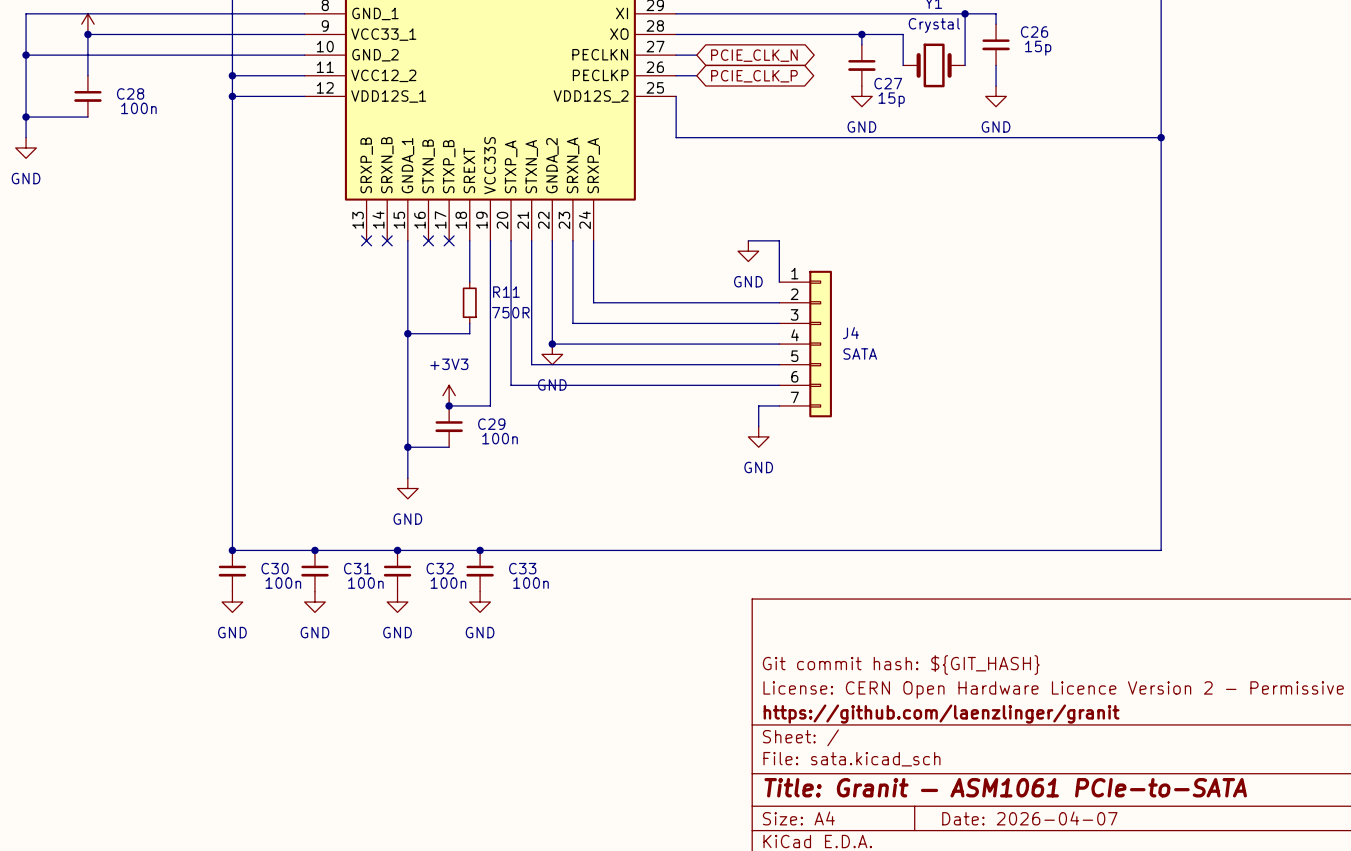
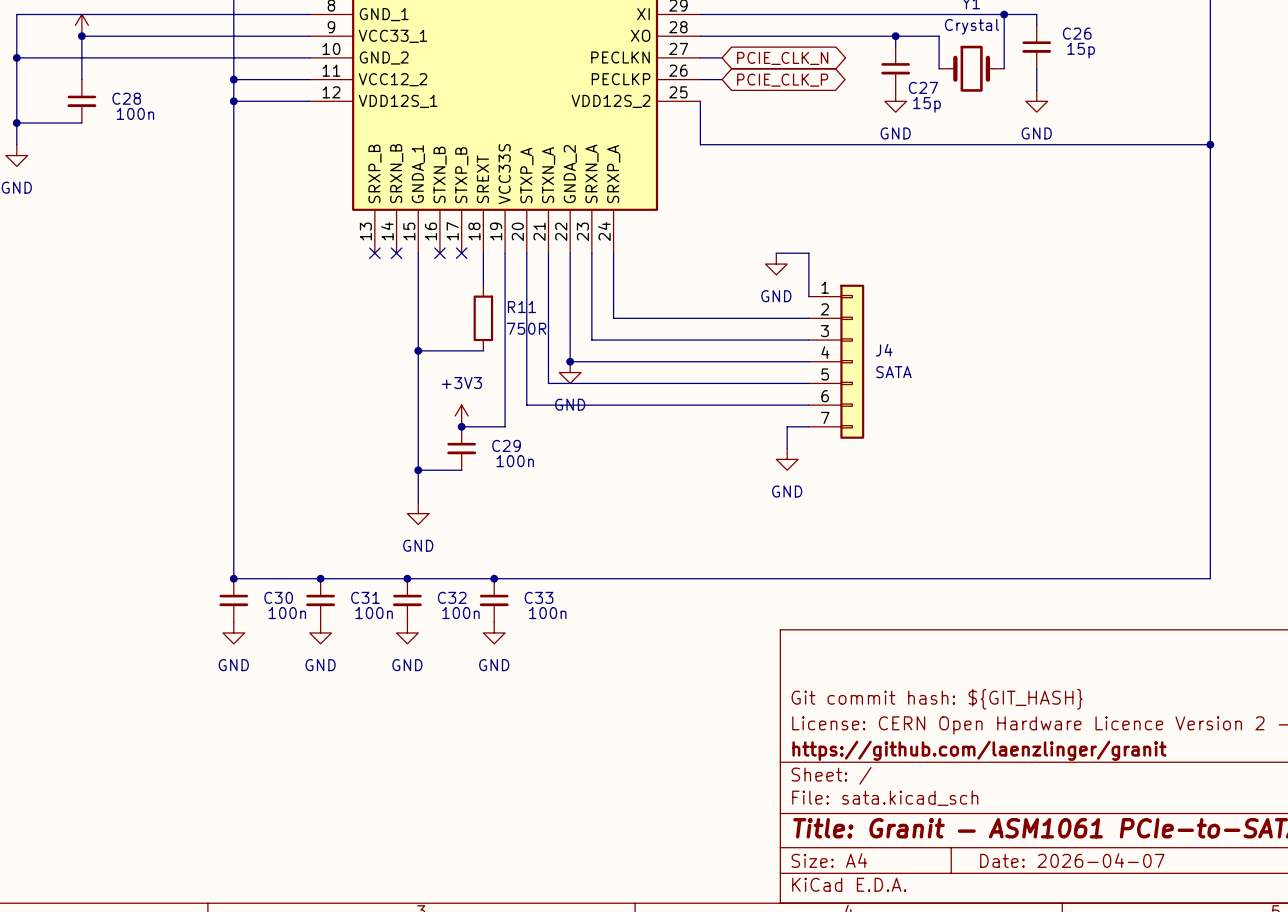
R11 symbol: [462, 282, 477, 324] -> [473, 285, 494, 351]

